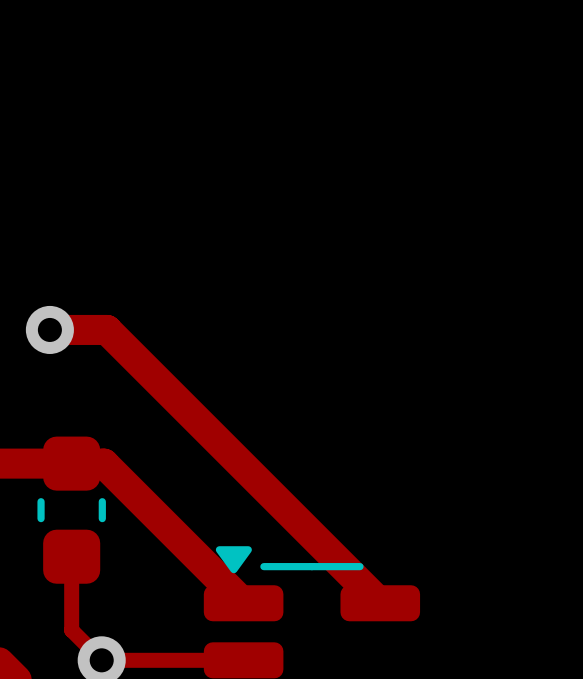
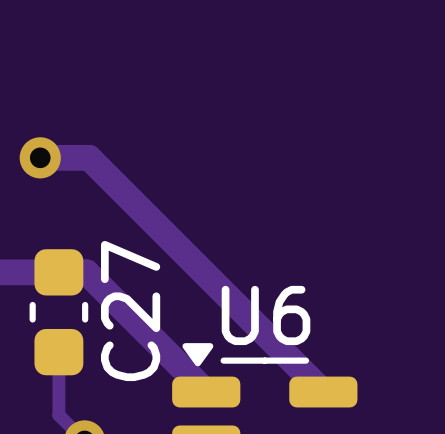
C27 name: none -> C27 (130, 311)
U6 name: none -> U6 (266, 315)

